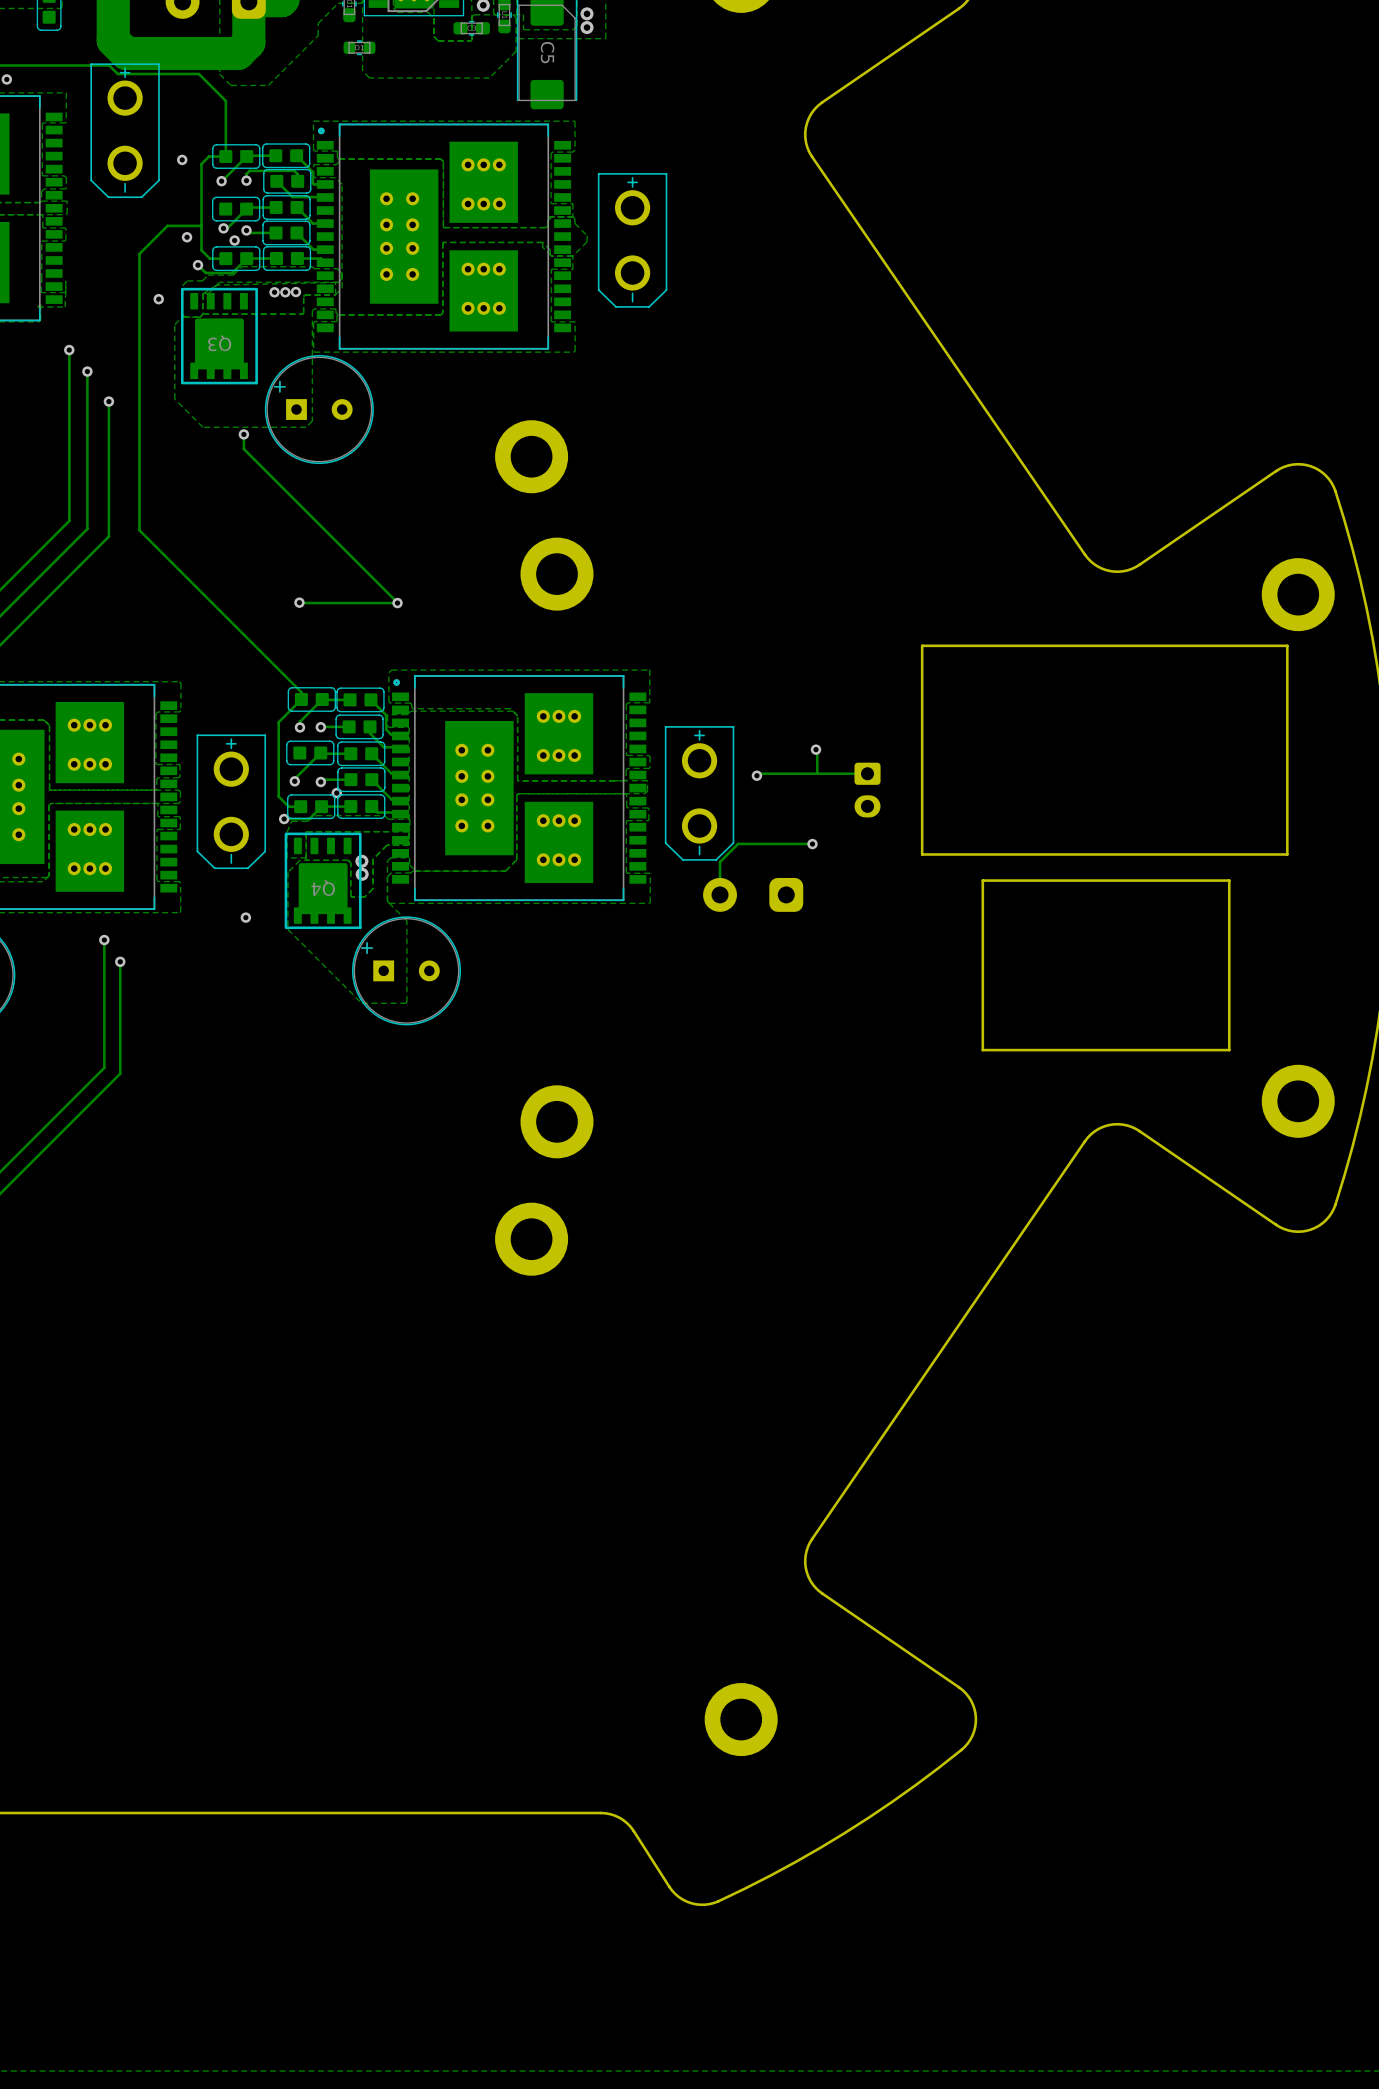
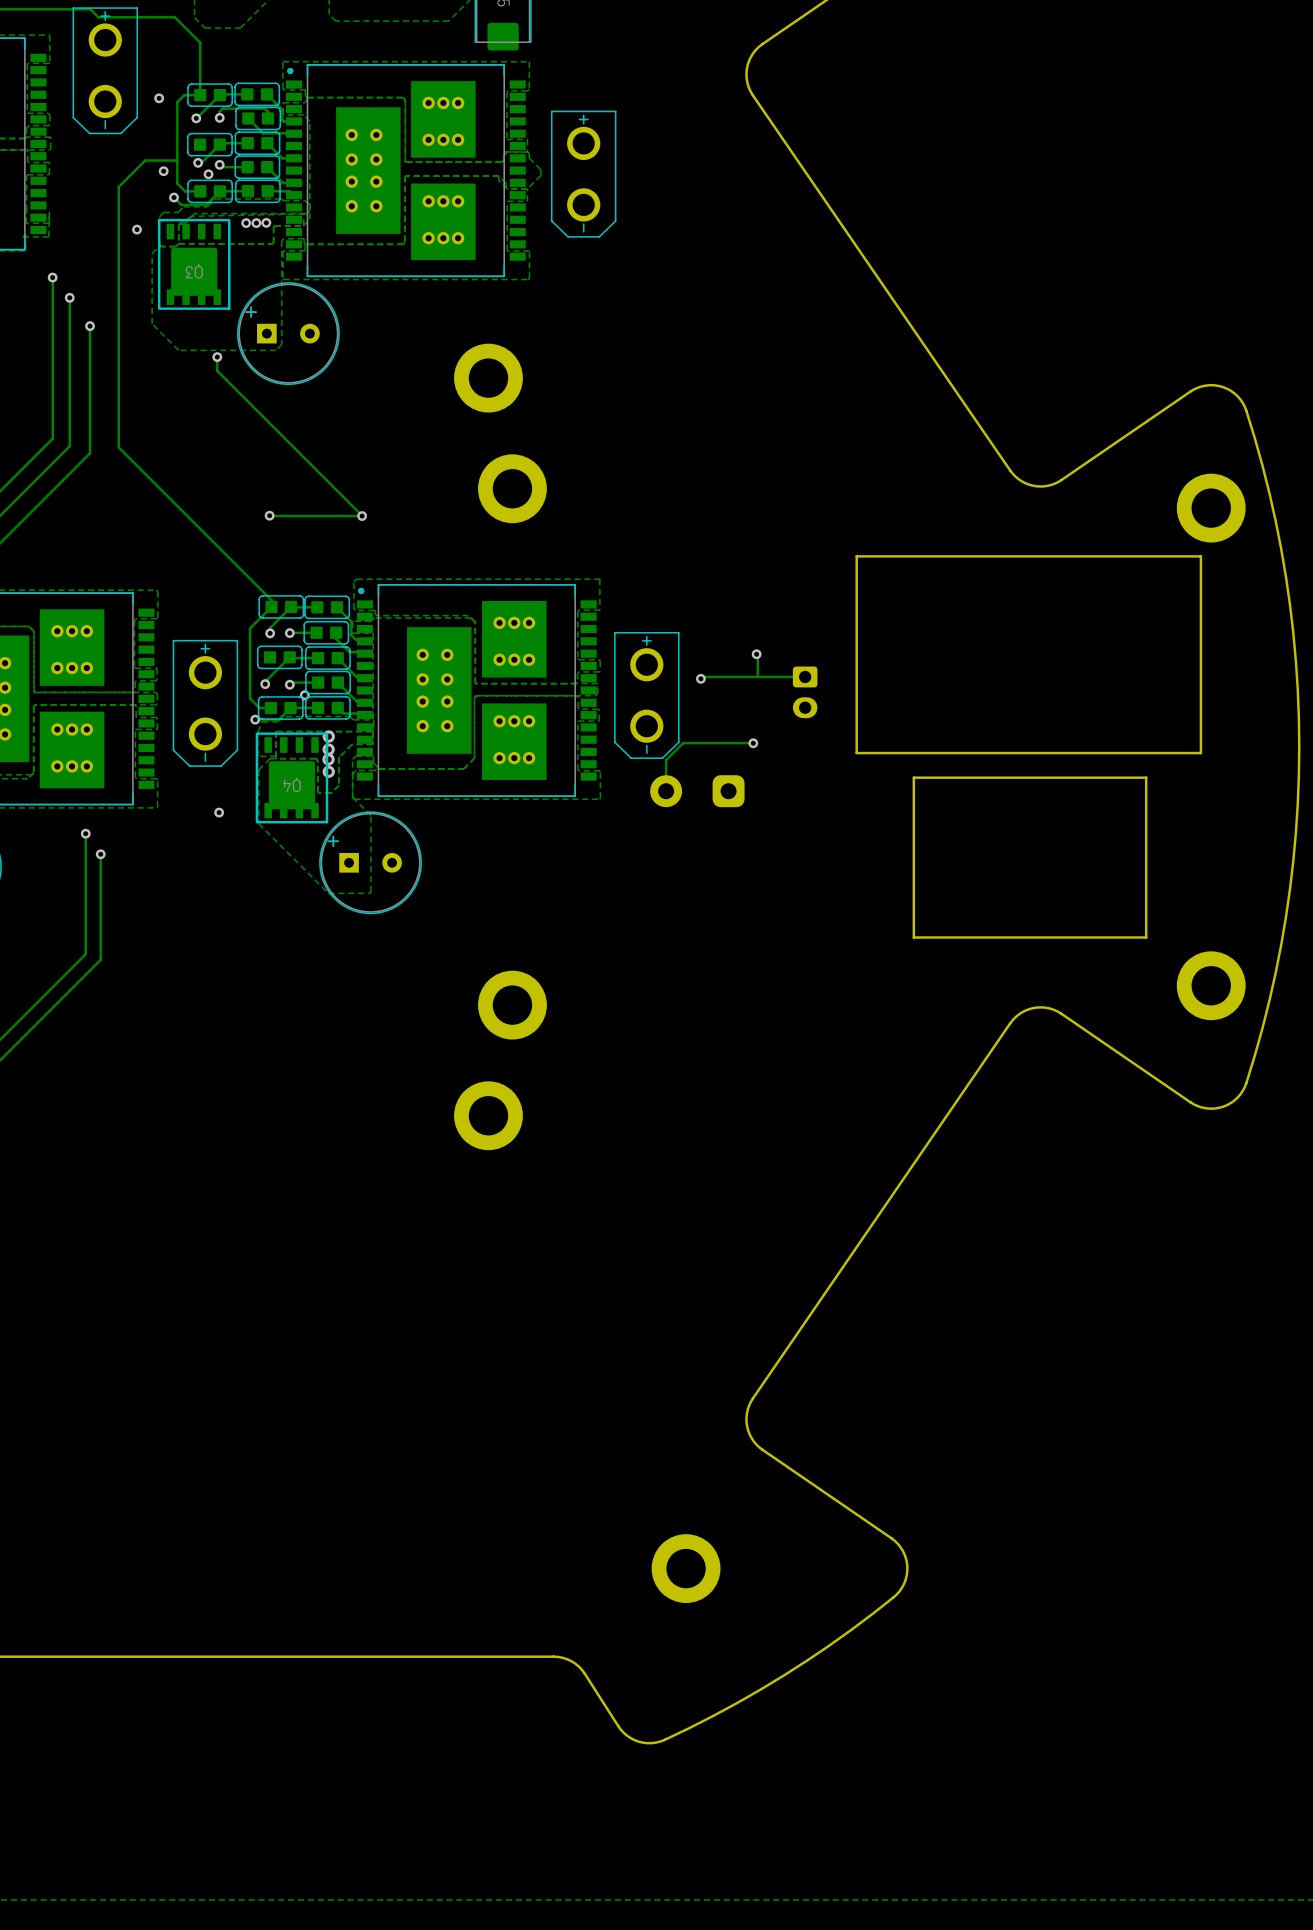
via: none -> (328, 736)
via: none -> (328, 749)

